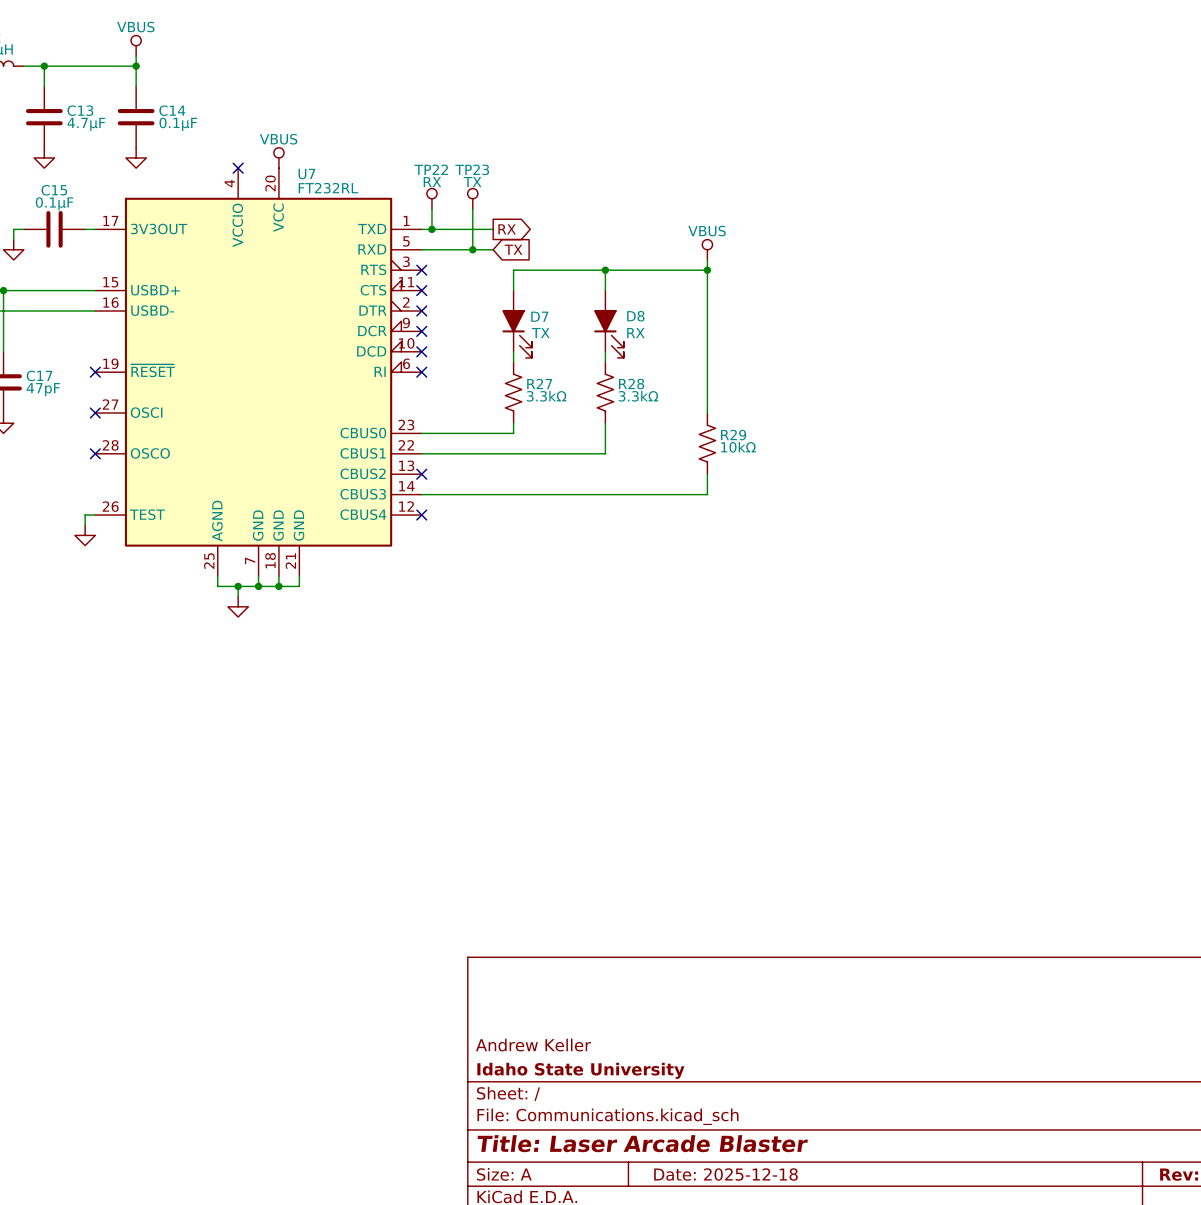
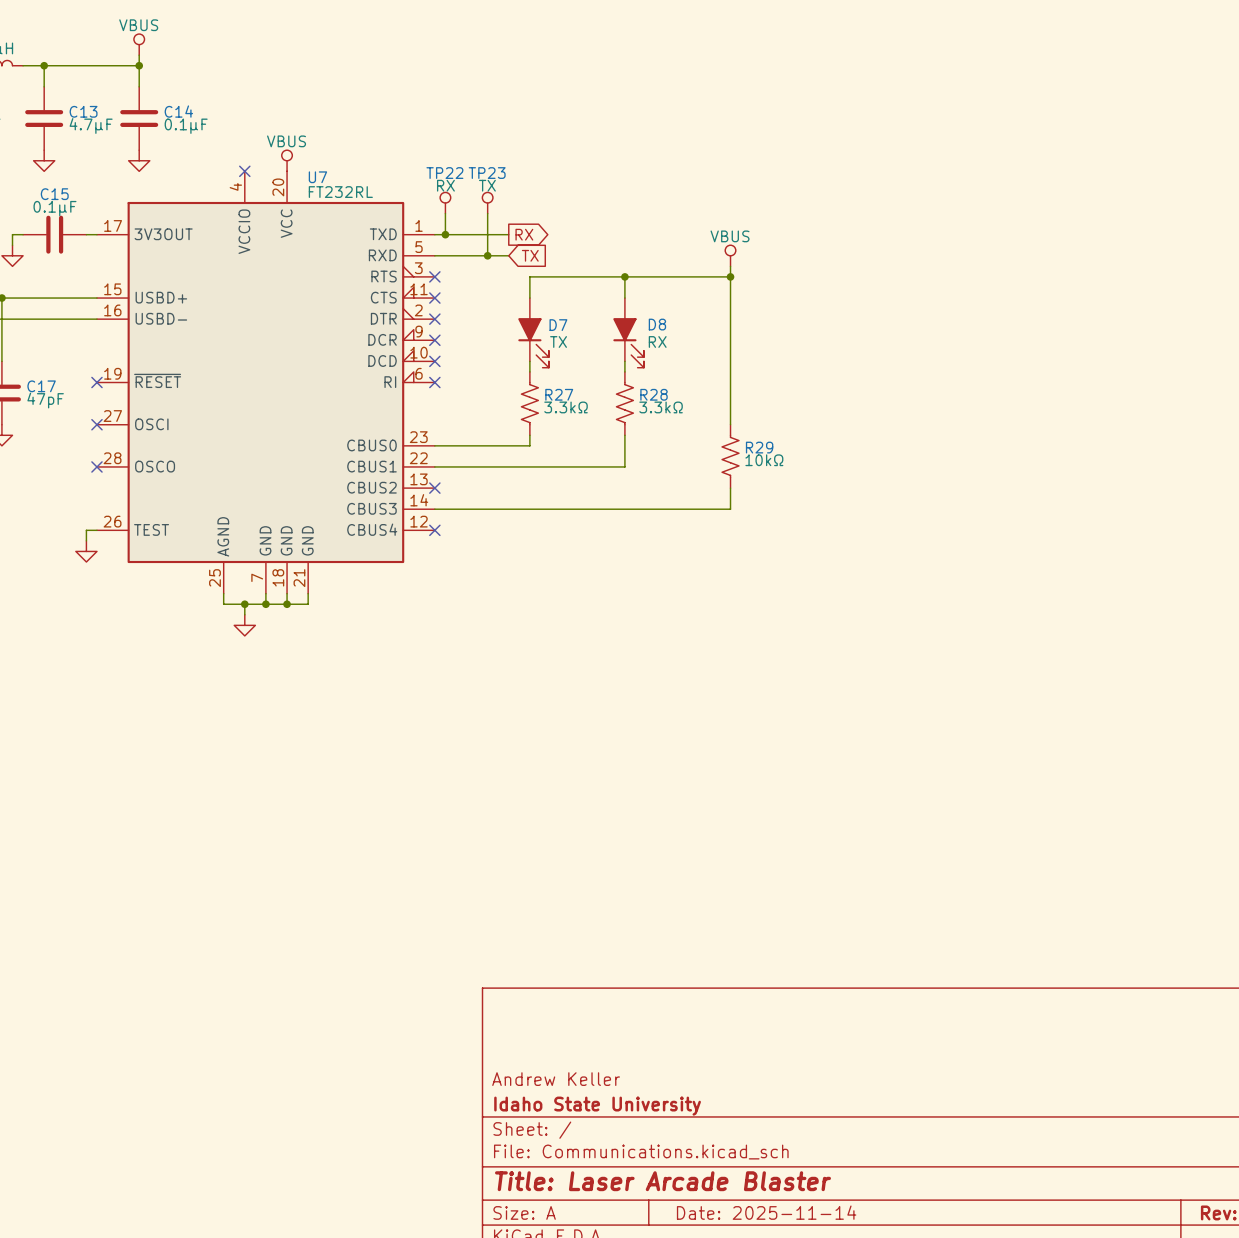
title block: Date: 2025-12-18 (725, 1174) -> Date: 2025-11-14 (766, 1212)

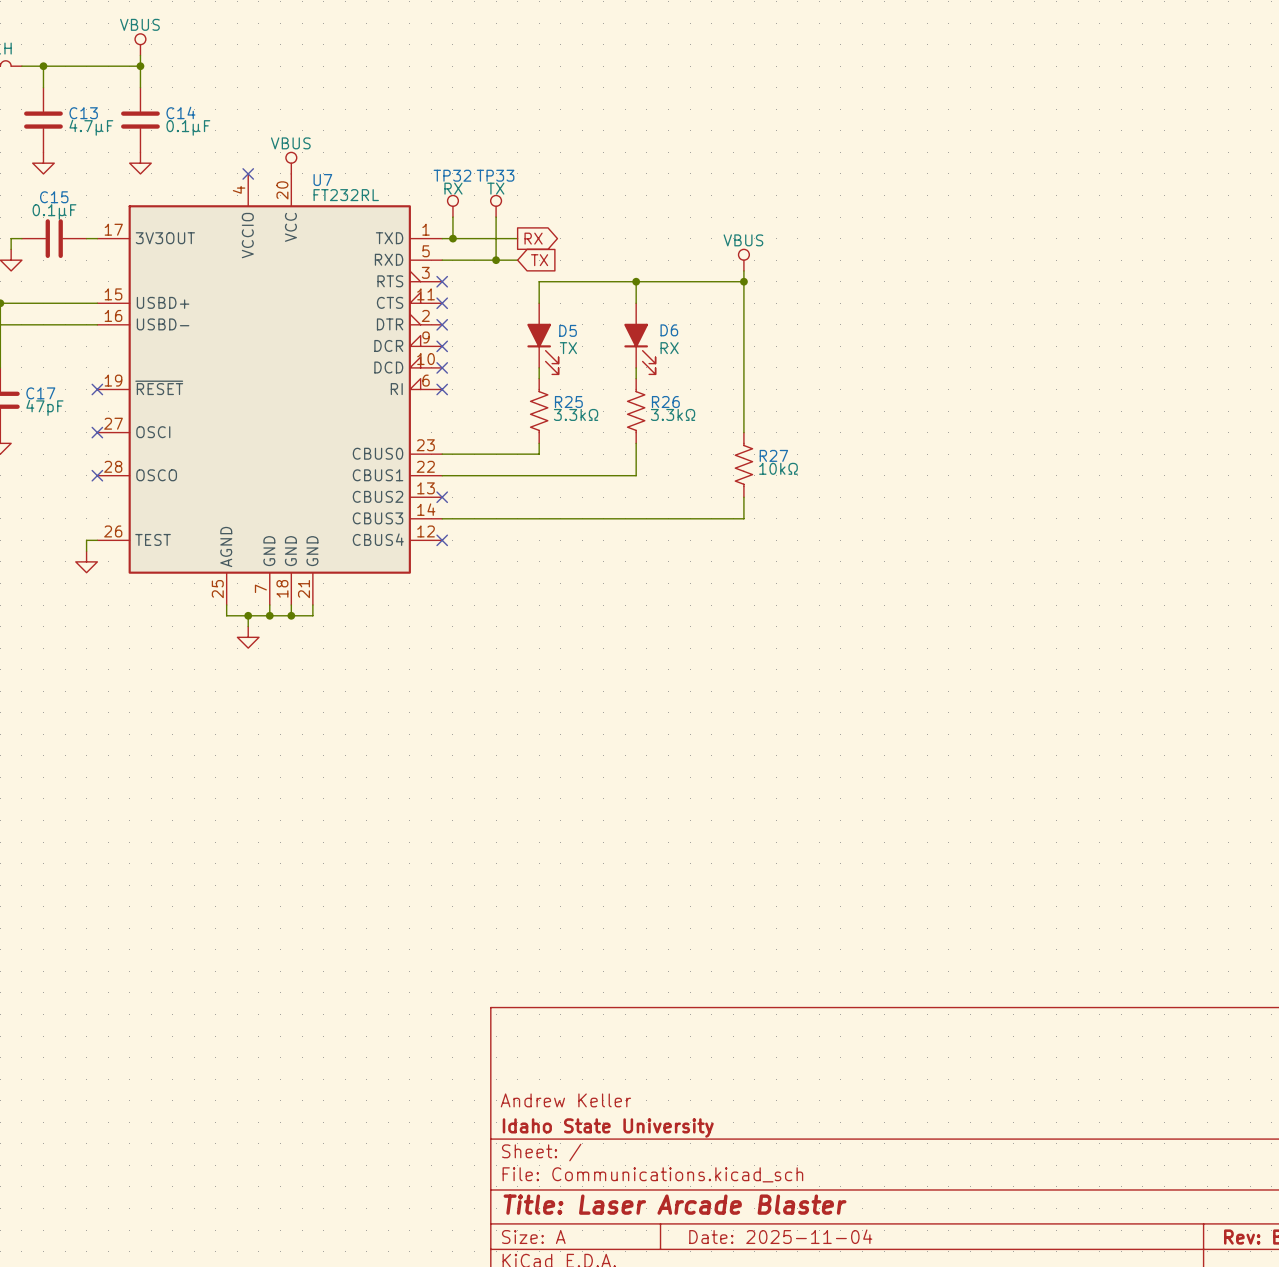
TP22 name: TP22 (444, 173) -> TP32 (452, 175)
TP23 name: TP23 (487, 173) -> TP33 (495, 175)
D8 name: D8 (657, 324) -> D6 (669, 330)
D7 name: D7 (558, 325) -> D5 (568, 330)
R27 name: R27 (559, 394) -> R25 (568, 402)
R28 name: R28 (654, 394) -> R26 (665, 402)
R29 name: R29 (759, 447) -> R27 (773, 455)
title block: Date: 2025-11-14 (766, 1212) -> Date: 2025-11-04 (780, 1236)

